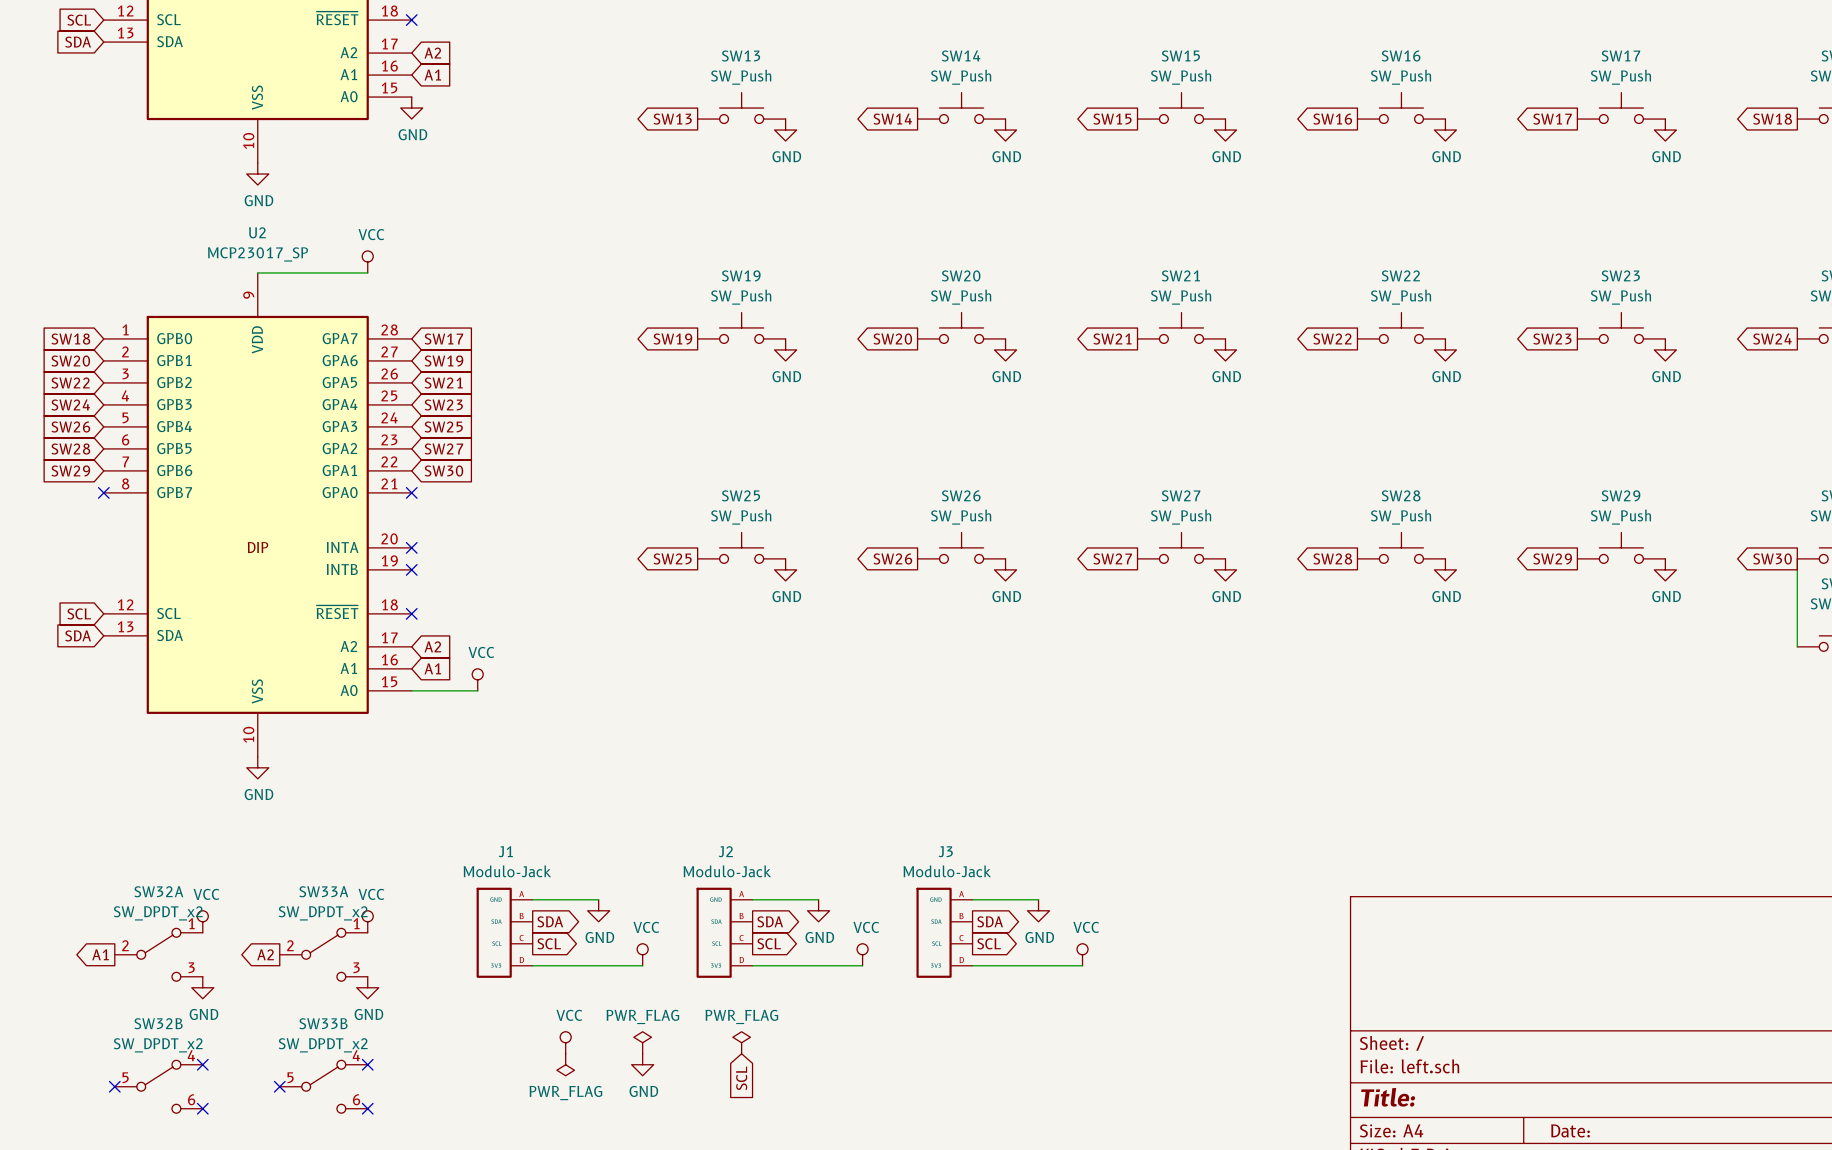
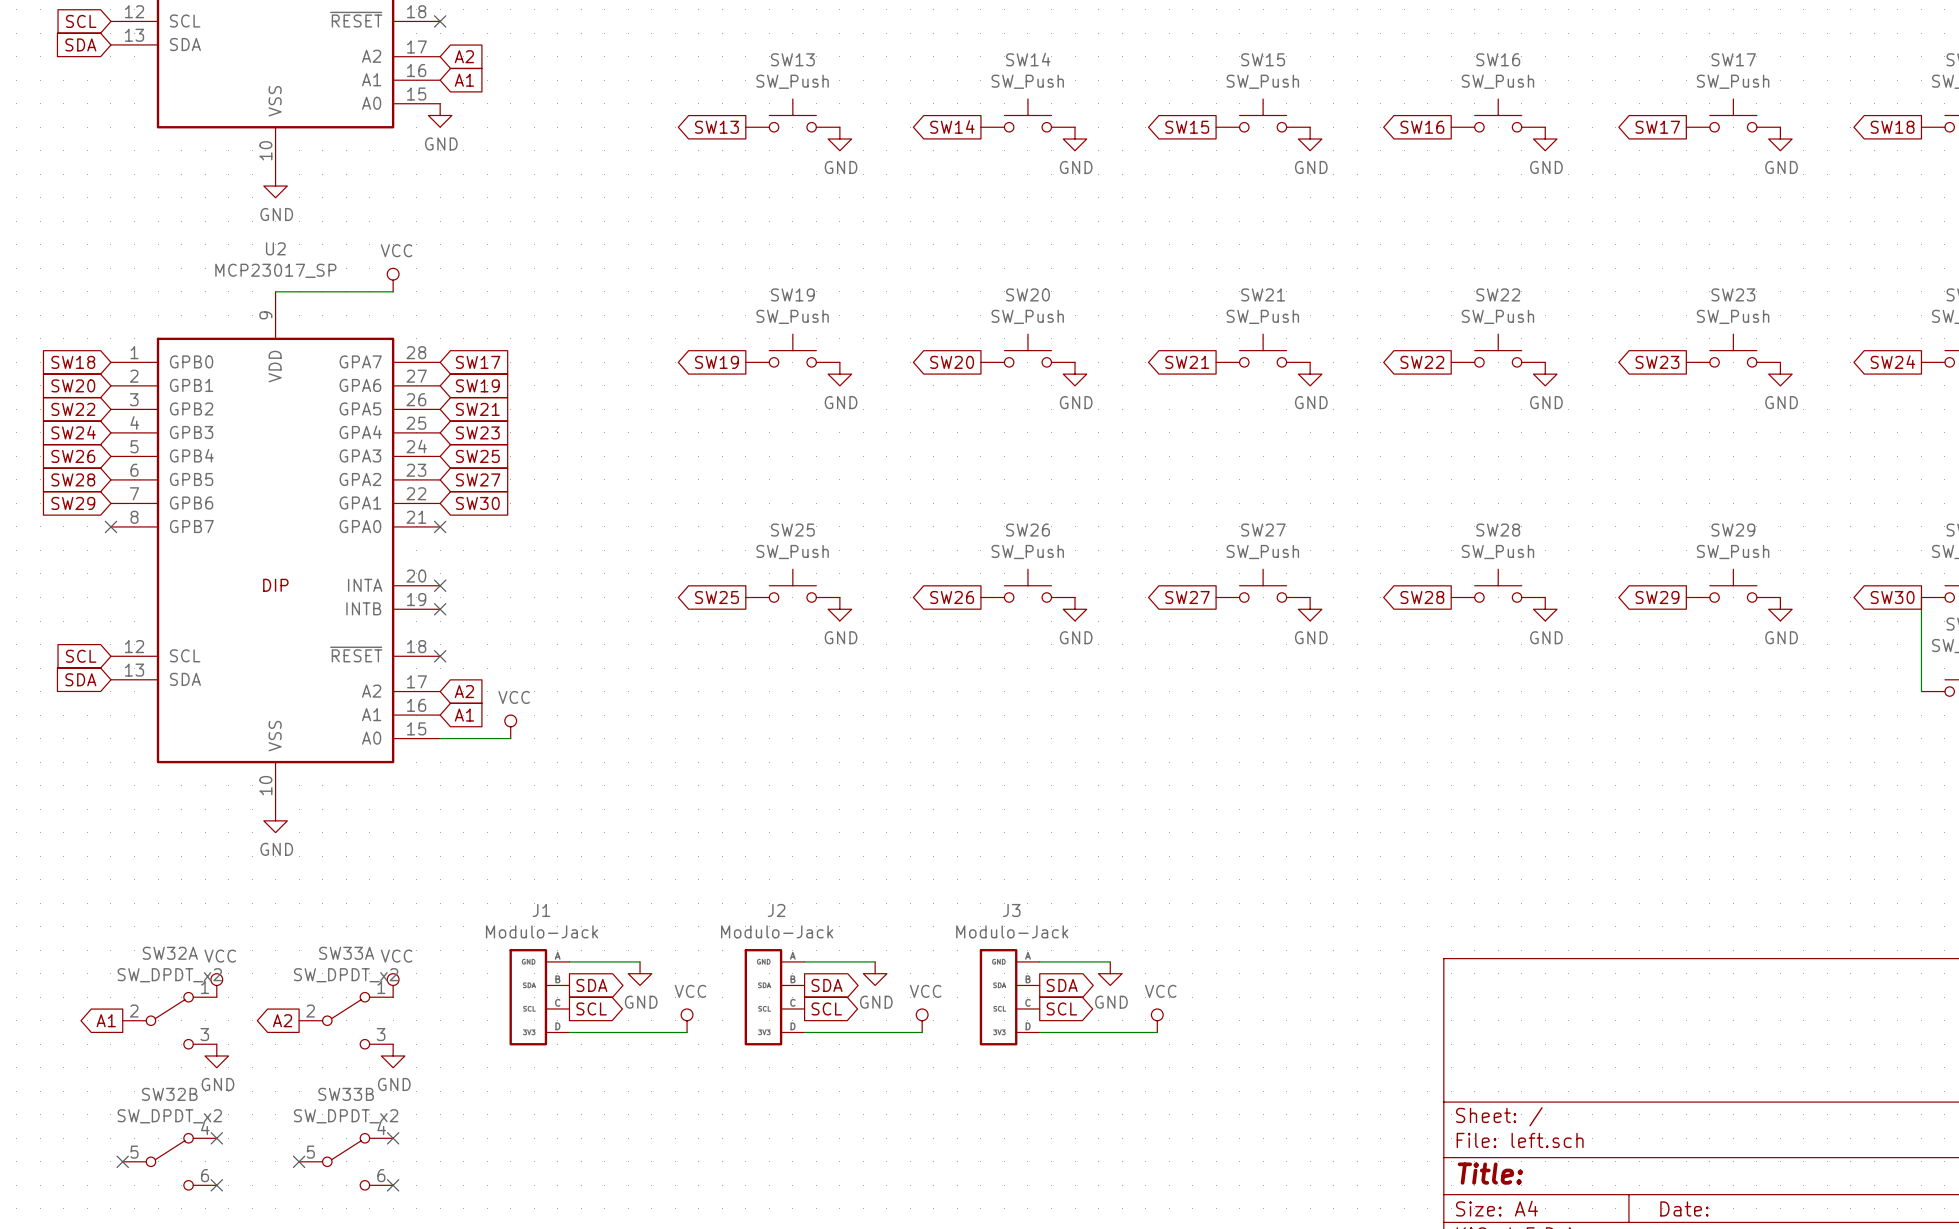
power symbol: VCC (565, 1042) -> none
power symbol: PWR_FLAG (642, 1042) -> none
power symbol: PWR_FLAG (741, 1042) -> none
power symbol: PWR_FLAG (565, 1064) -> none
power symbol: GND (642, 1064) -> none
global label: SCL (741, 1078) -> none

